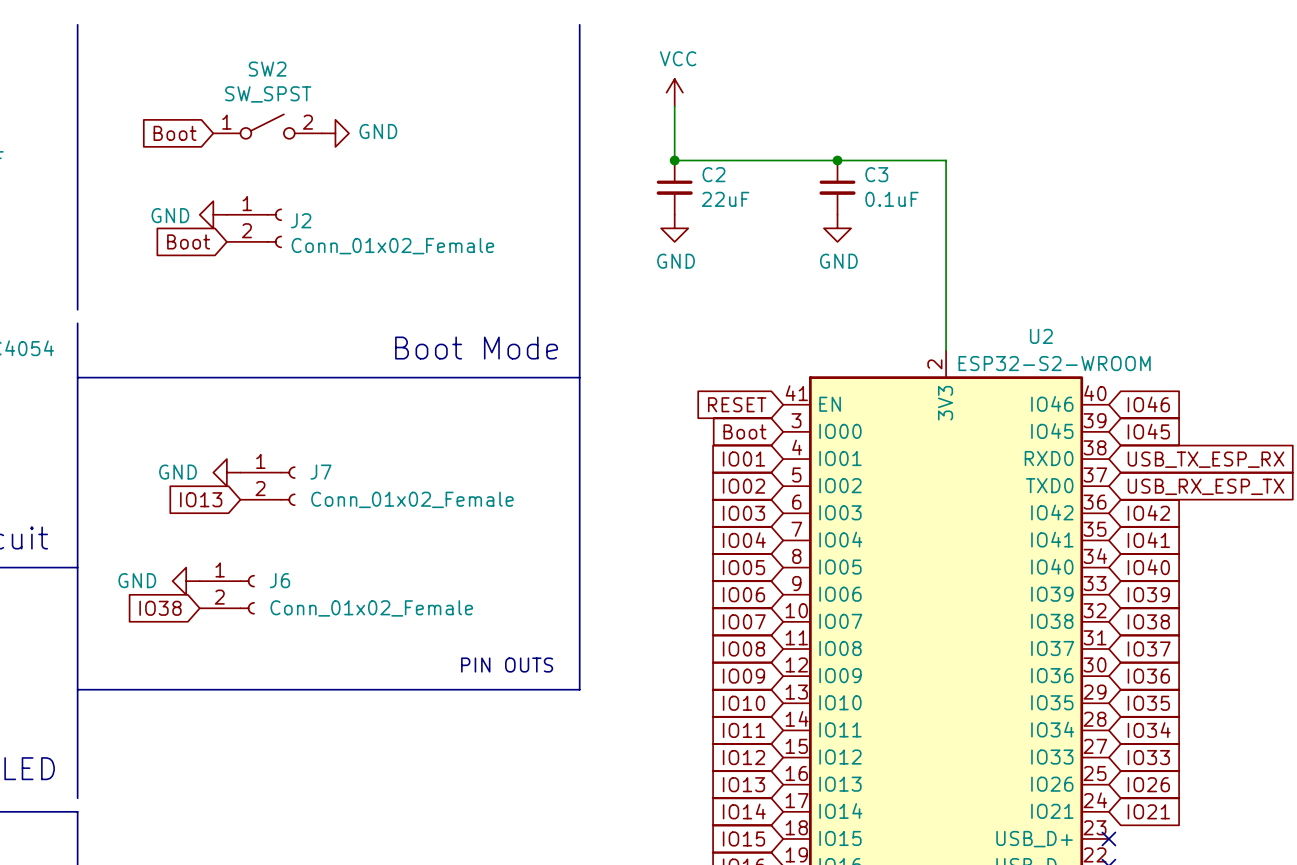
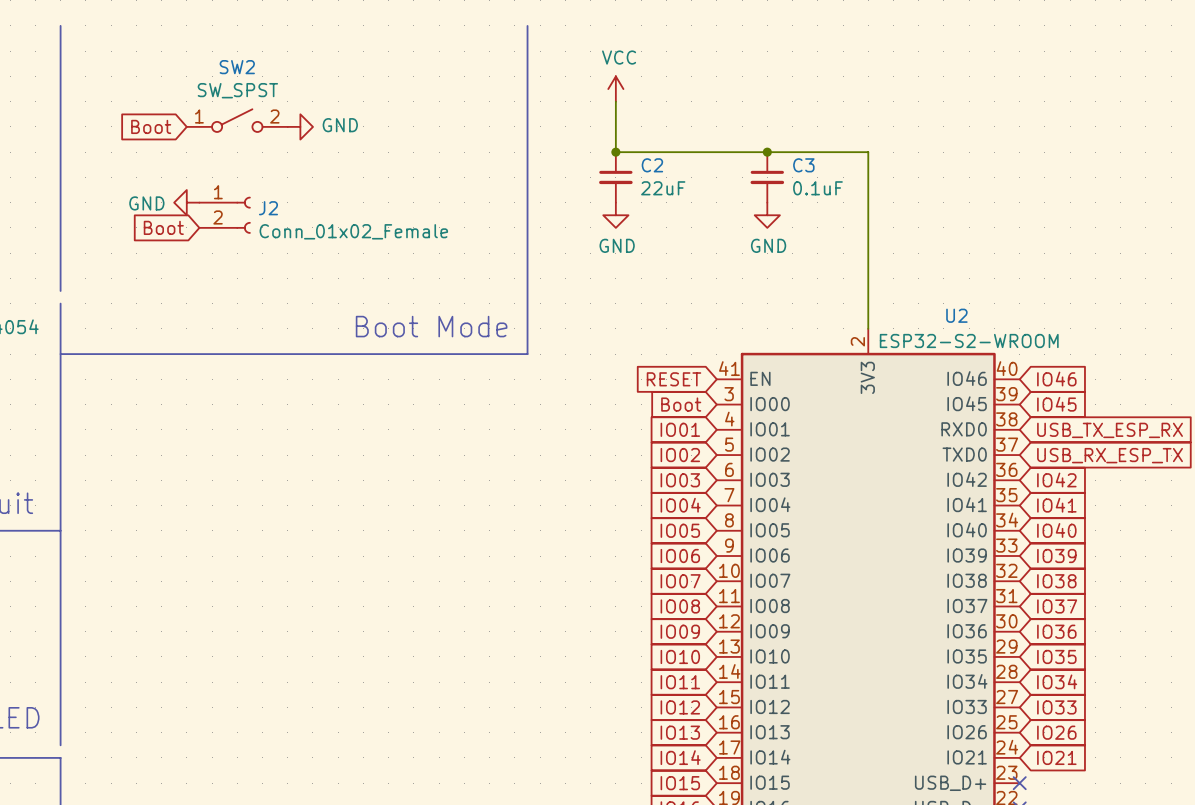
line: (579, 377) (579, 689) (77, 689) -> none
power symbol: GND (226, 472) -> none
J7: Conn_01x02_Female (268, 486) -> none
global label: IO13 (201, 499) -> none
power symbol: GND (186, 581) -> none
J6: Conn_01x02_Female (227, 594) -> none
global label: IO38 (160, 608) -> none
text: PIN OUTS (507, 665) -> none

